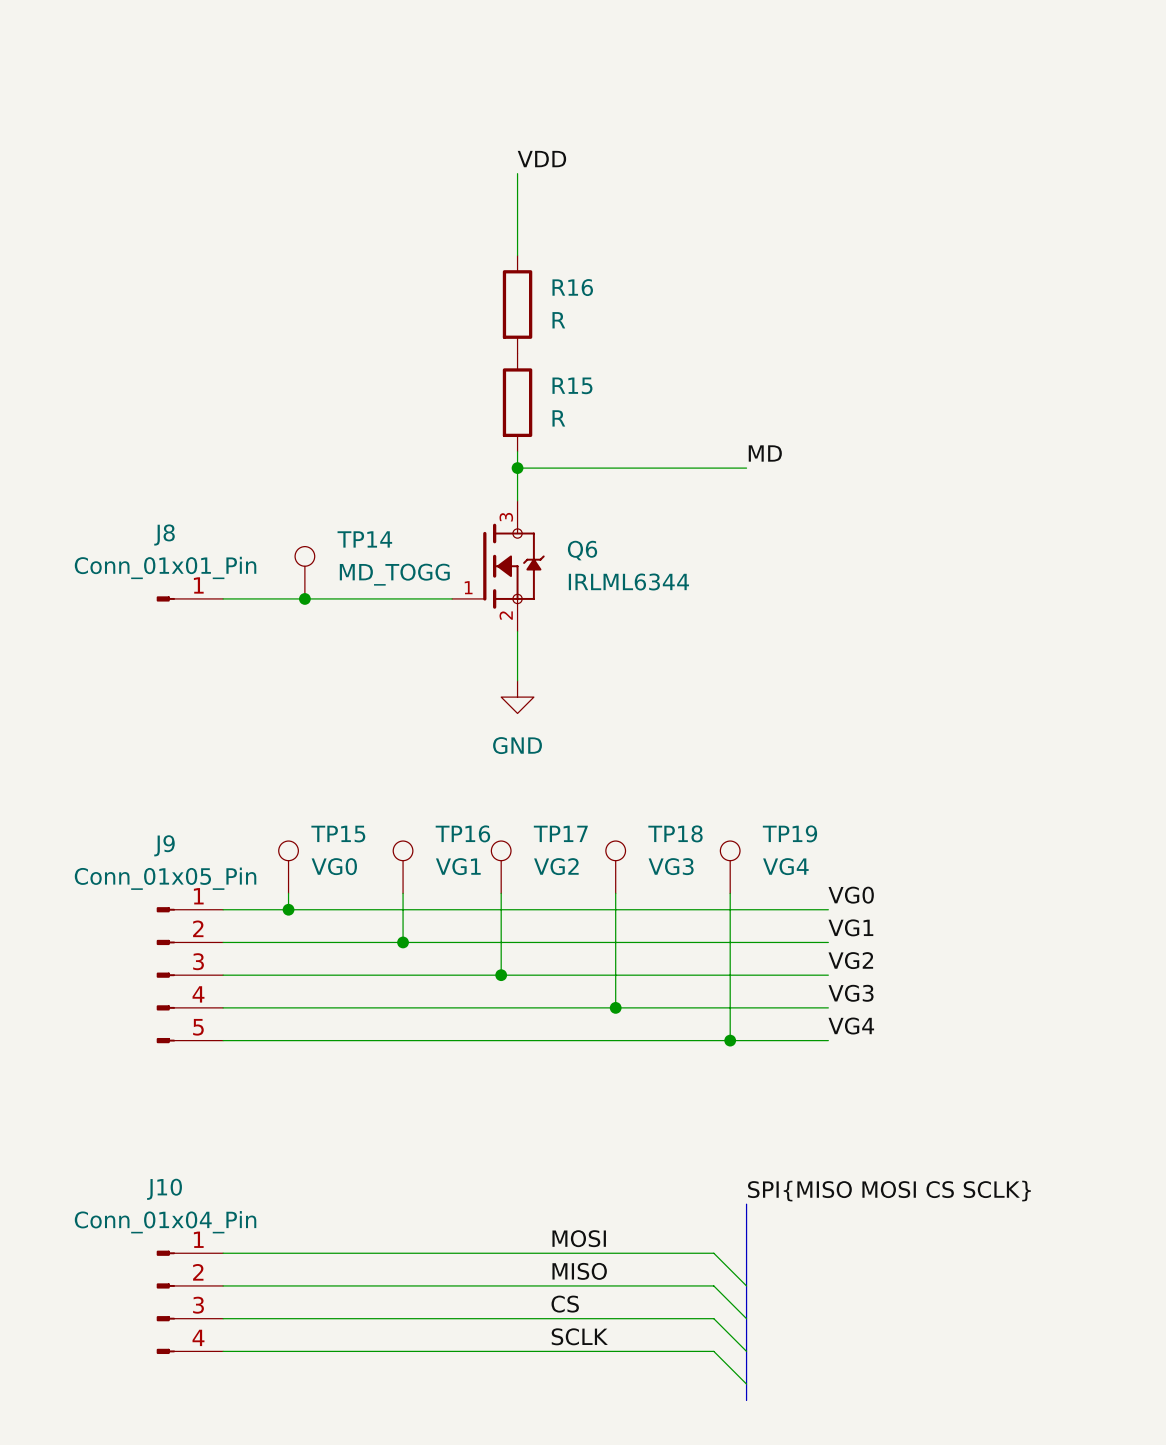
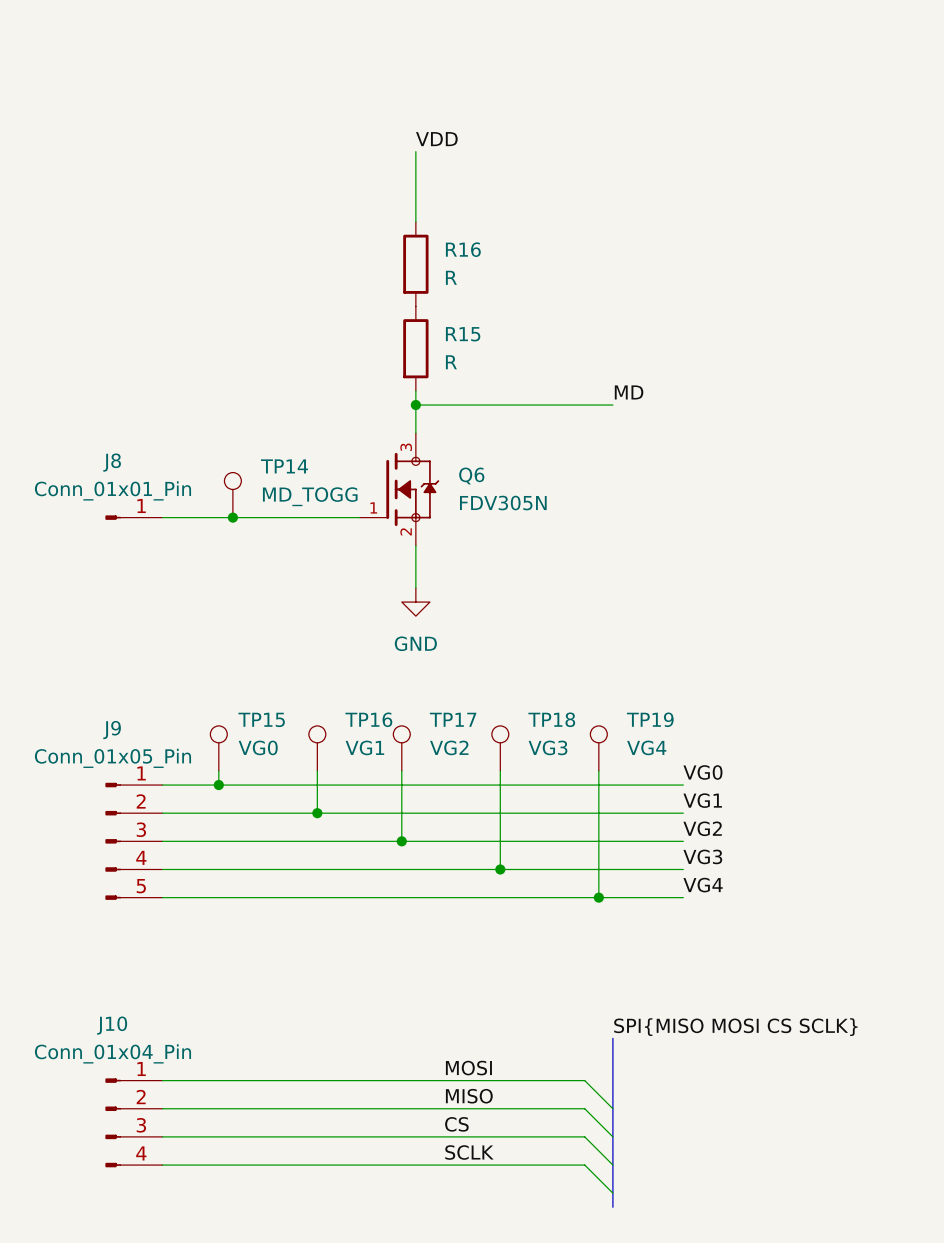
Q6 value: IRLML6344 (628, 581) -> FDV305N (503, 503)

